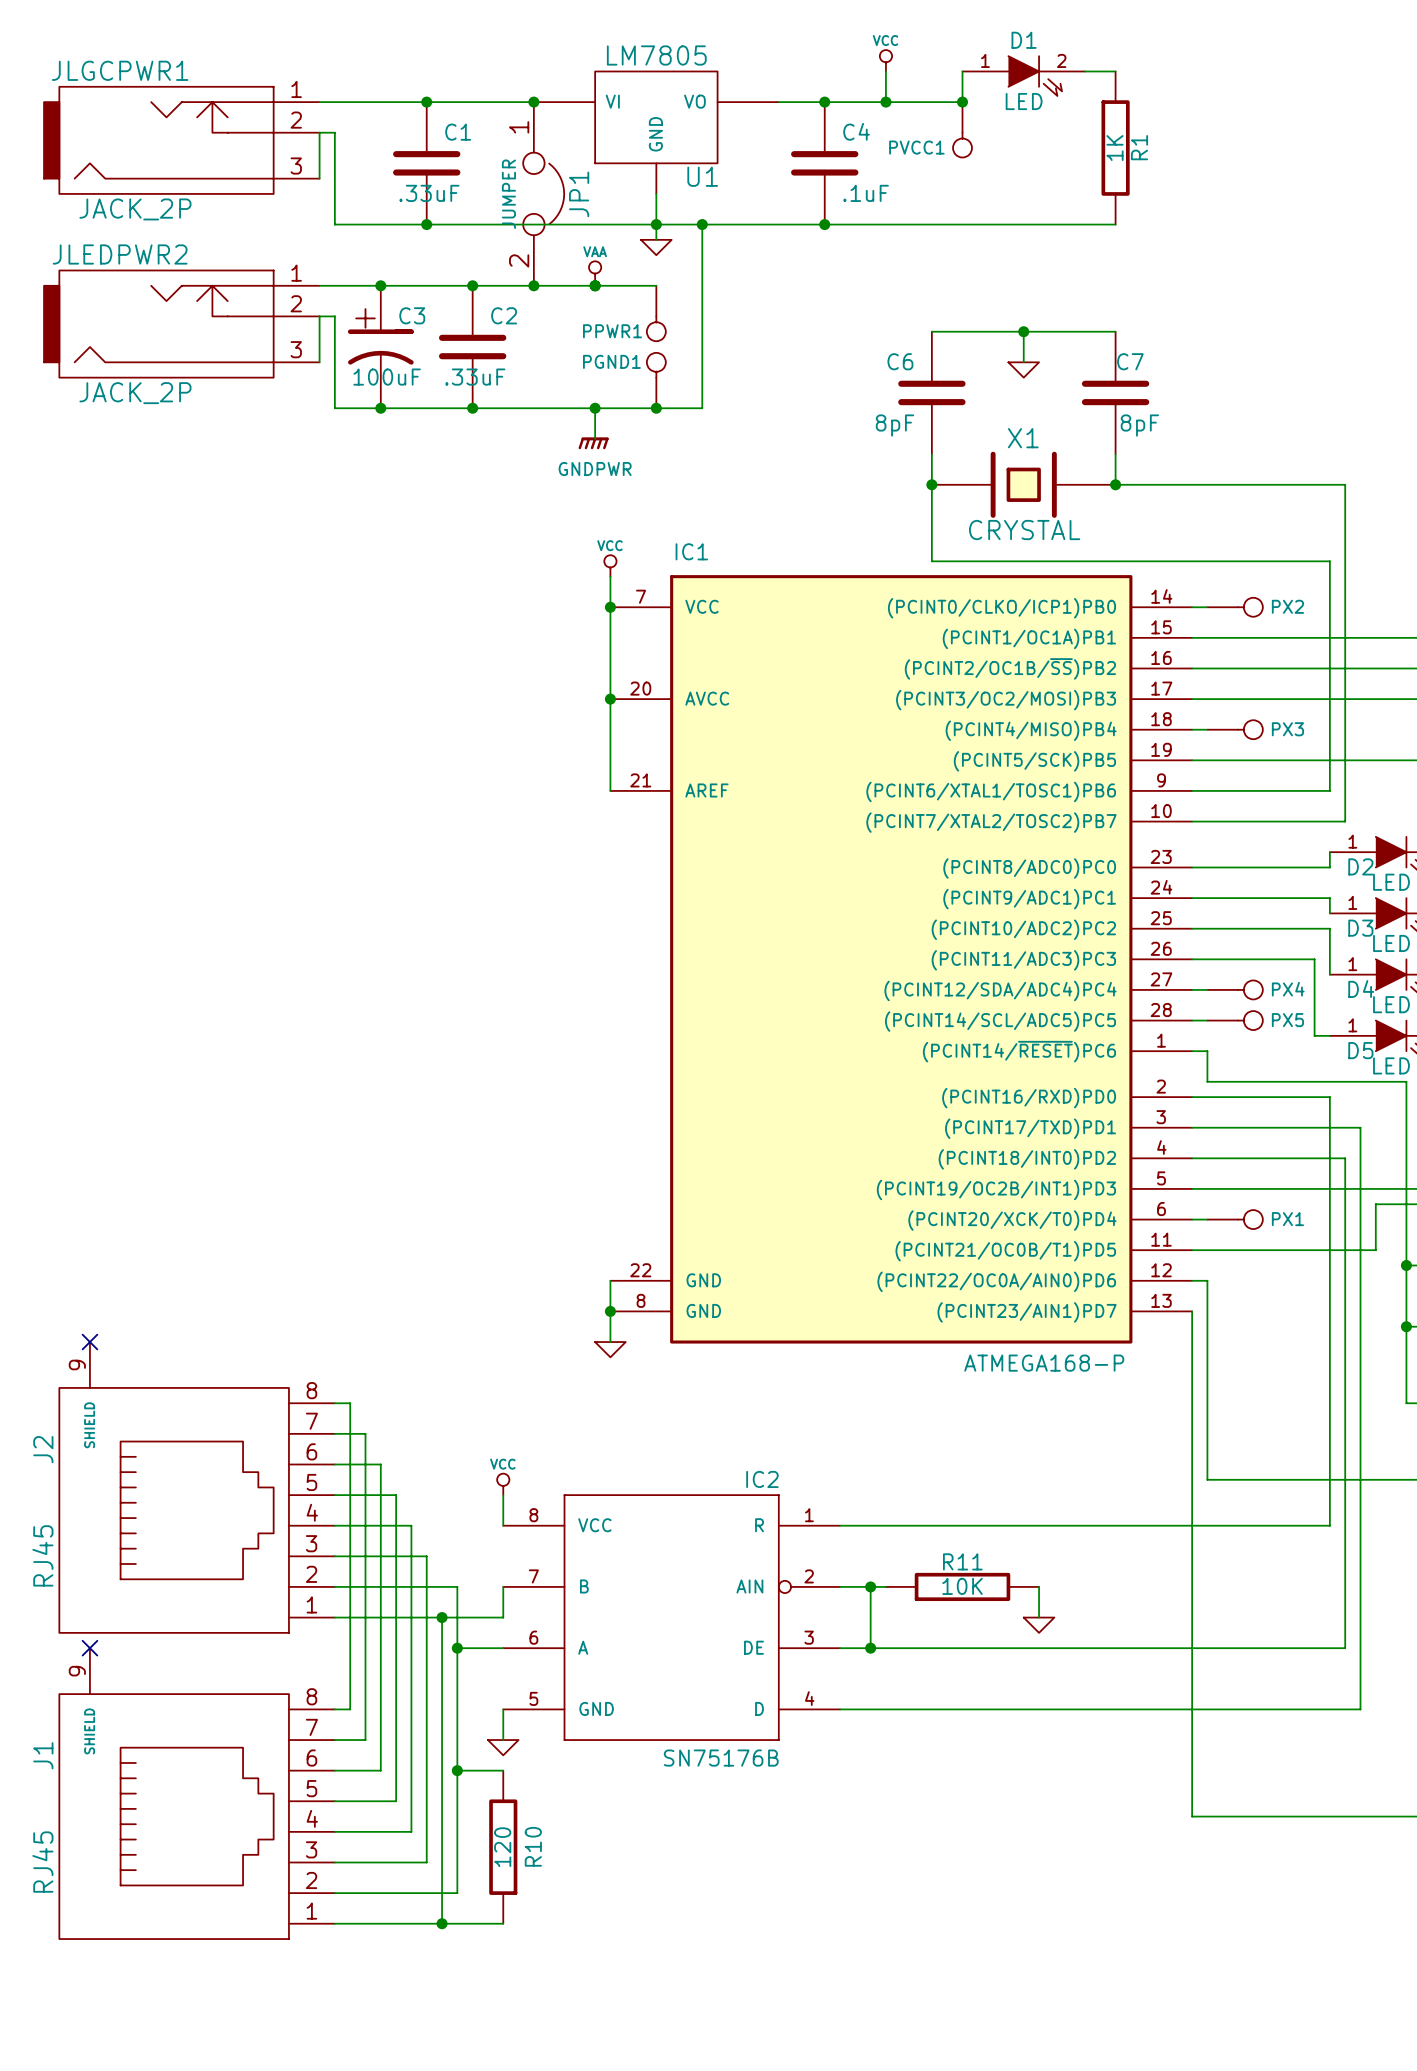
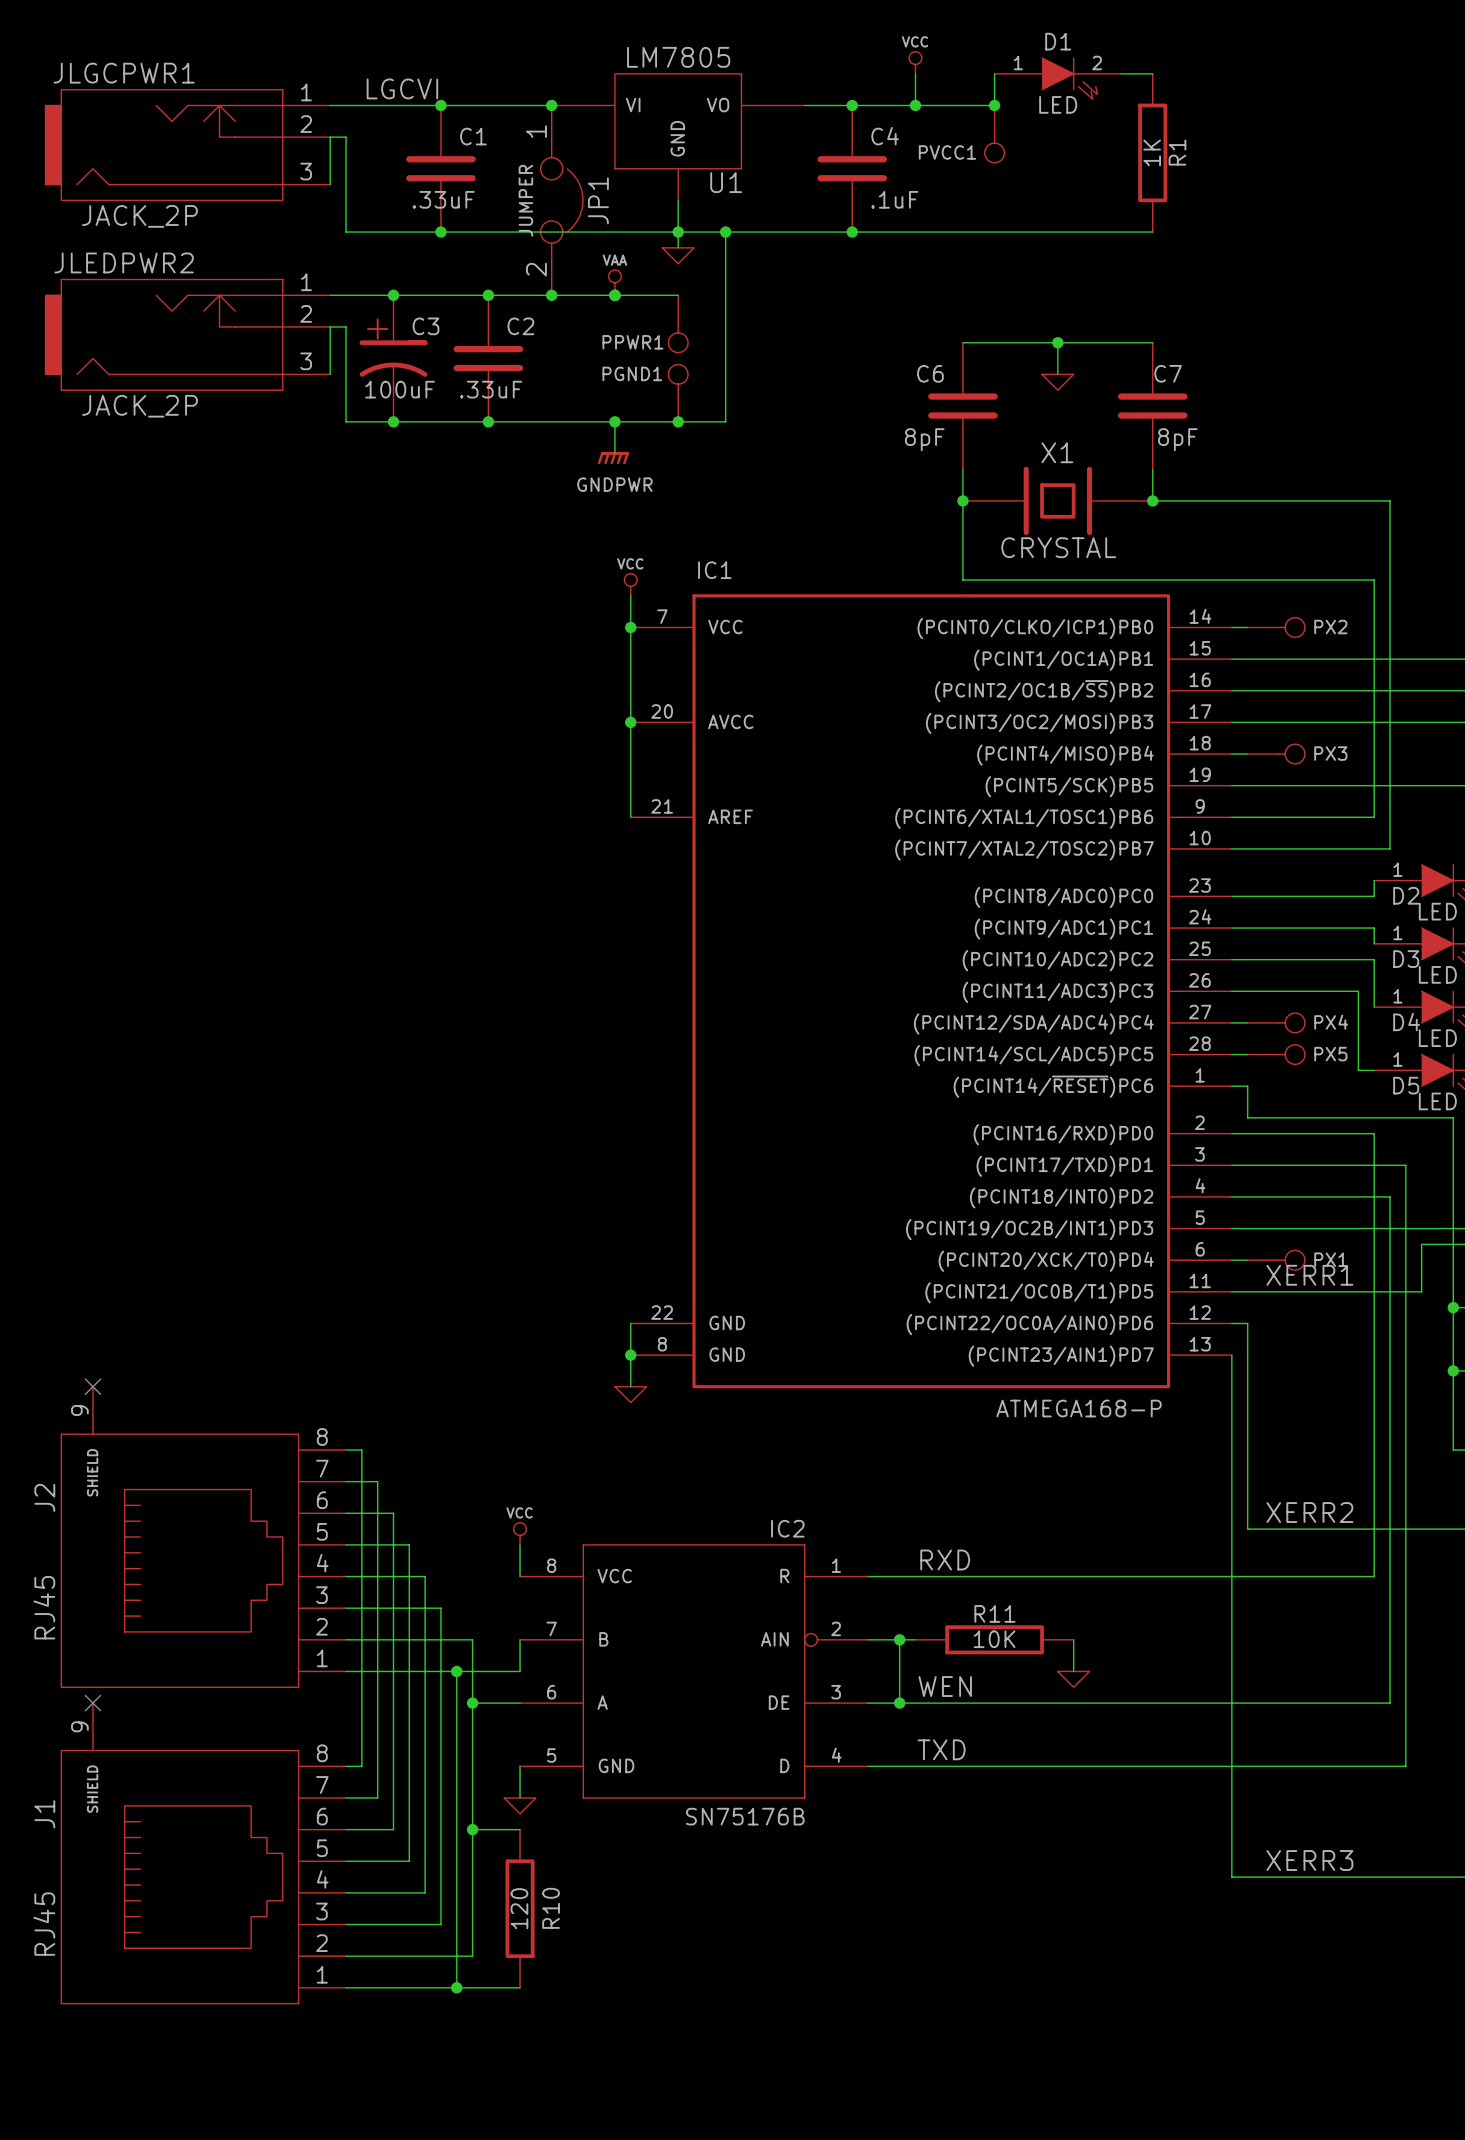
label: none -> LGCVI (402, 88)
label: none -> XERR1 (1309, 1275)
label: none -> XERR2 (1309, 1512)
label: none -> RXD (945, 1559)
label: none -> WEN (945, 1686)
label: none -> TXD (941, 1749)
label: none -> XERR3 (1309, 1860)

